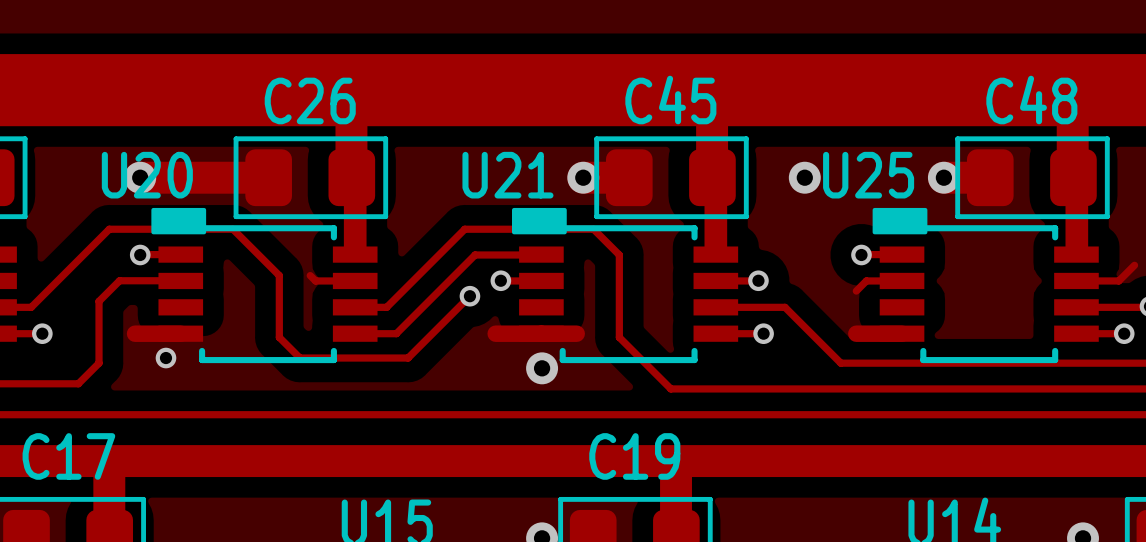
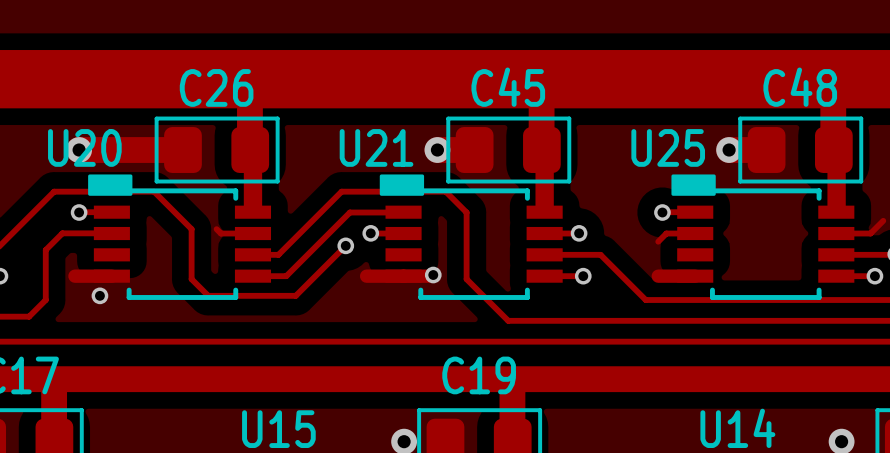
via: (804, 177) -> none
via: none -> (433, 275)
via: (542, 368) -> none

